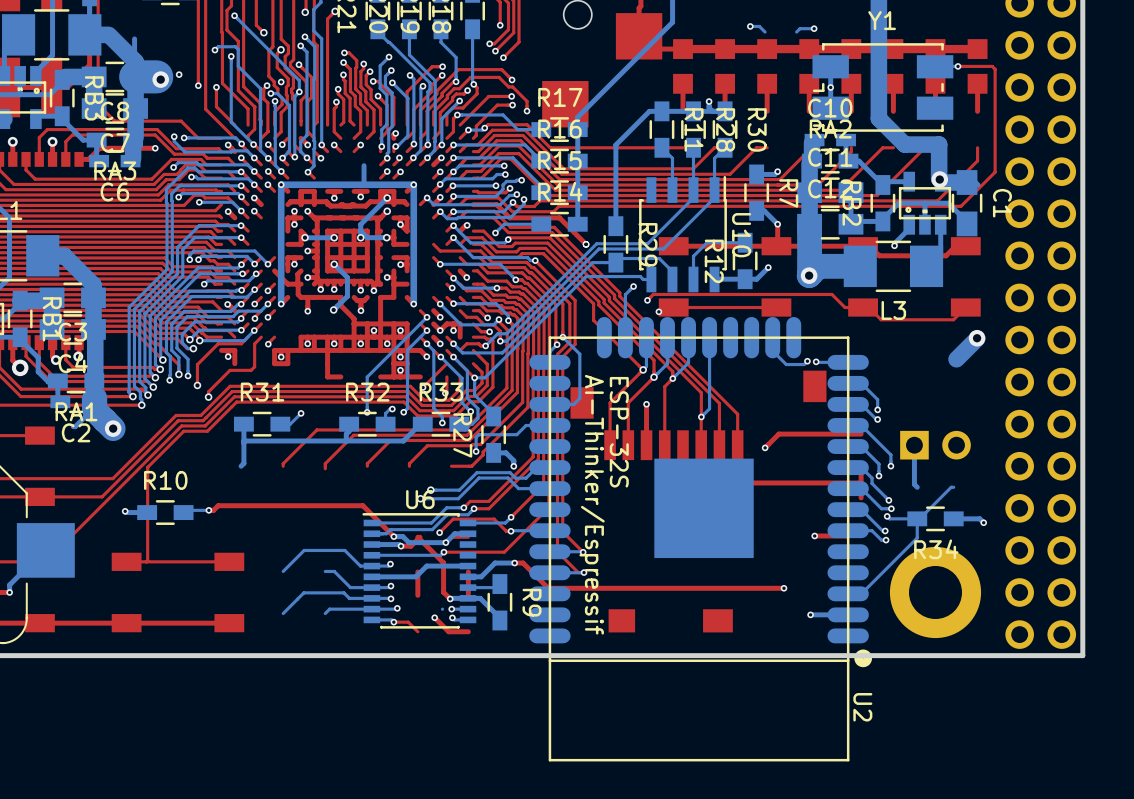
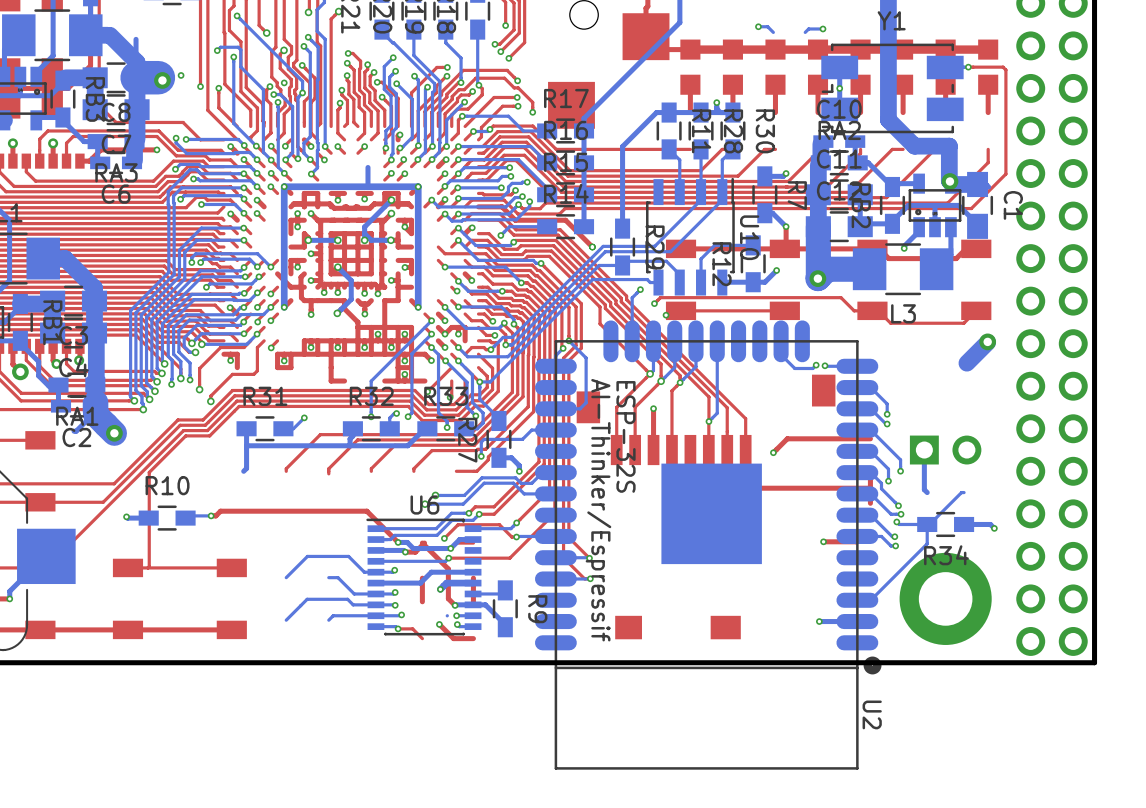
bottom track: (514, 563) (495, 563) (481, 576) (468, 576) -> (440, 589) (446, 583) (473, 583)
top track: (514, 563) (523, 563) (548, 588) (783, 588) -> none
via position: (514, 563) -> (440, 589)
via: (783, 588) -> none

